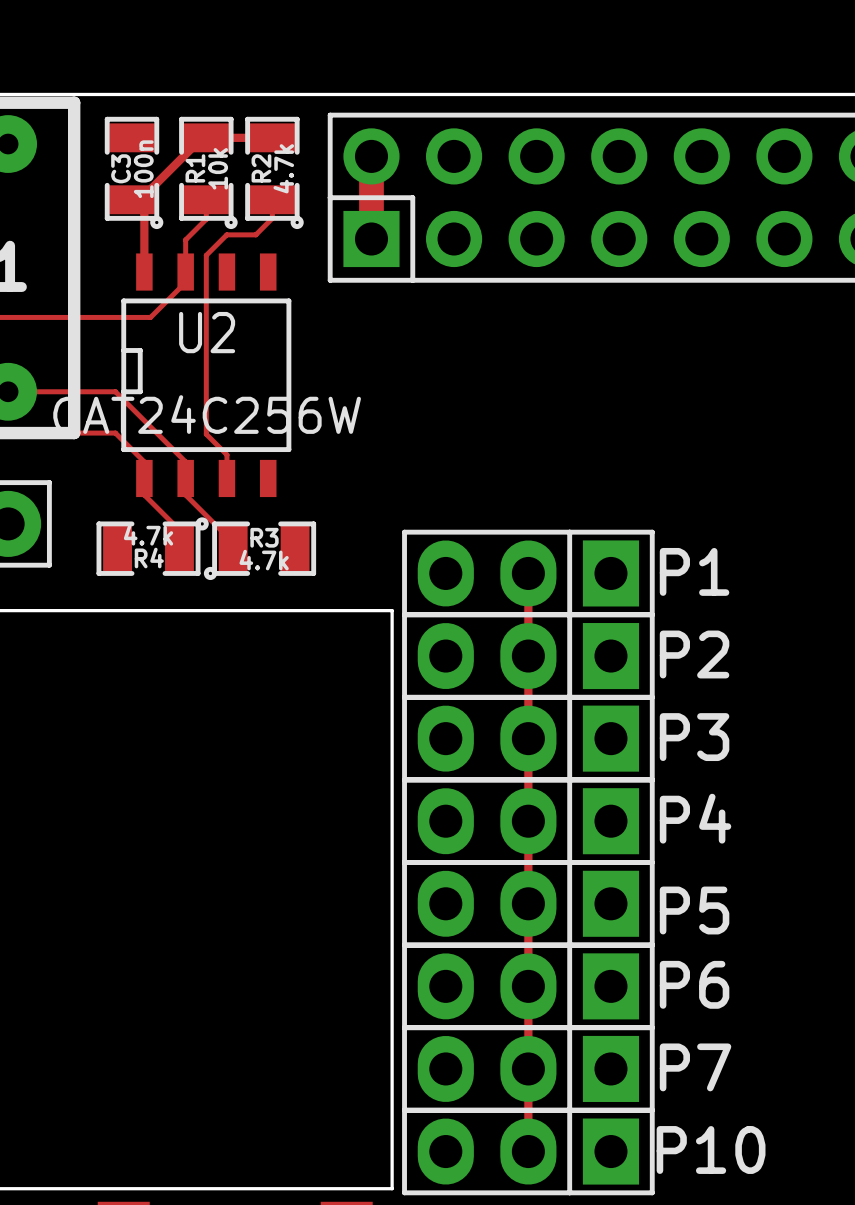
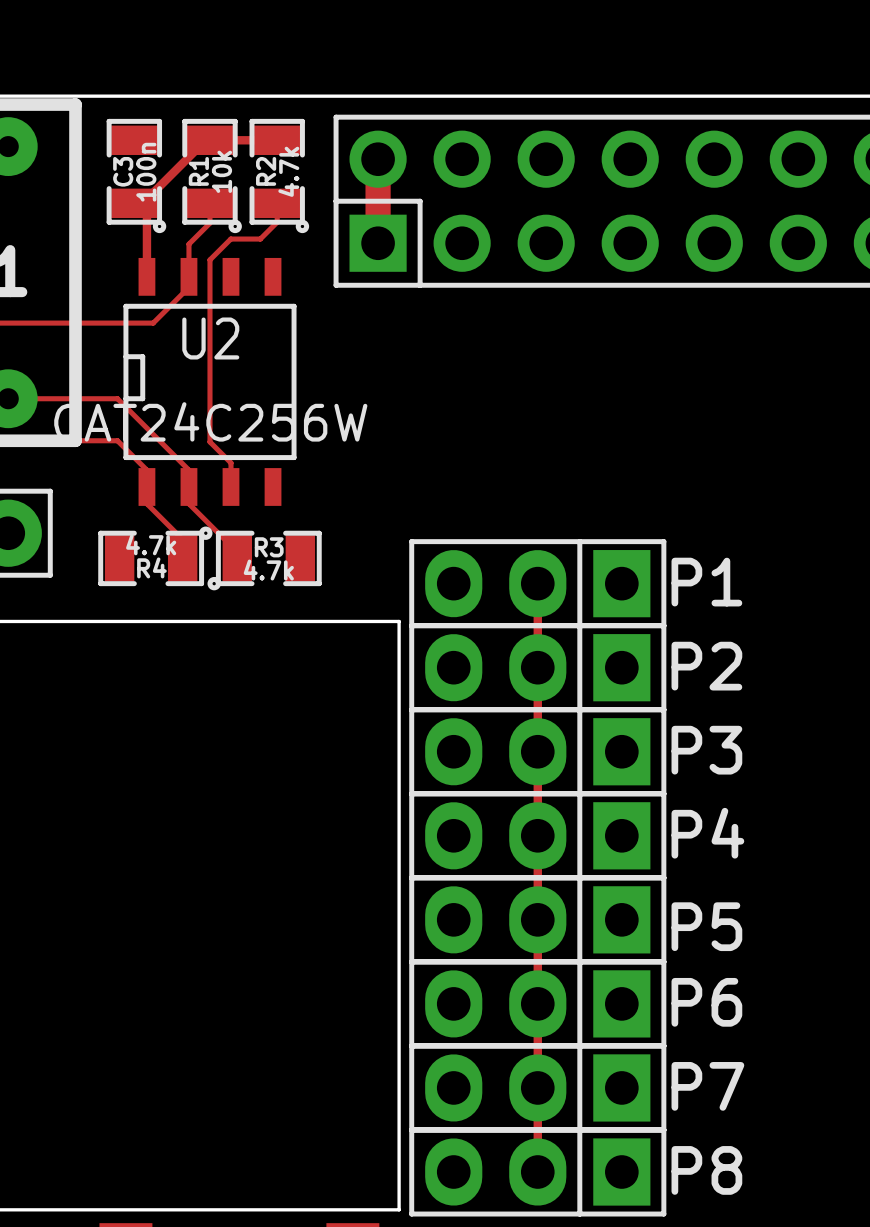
P10 name: P10 (711, 1149) -> P8 (706, 1170)

